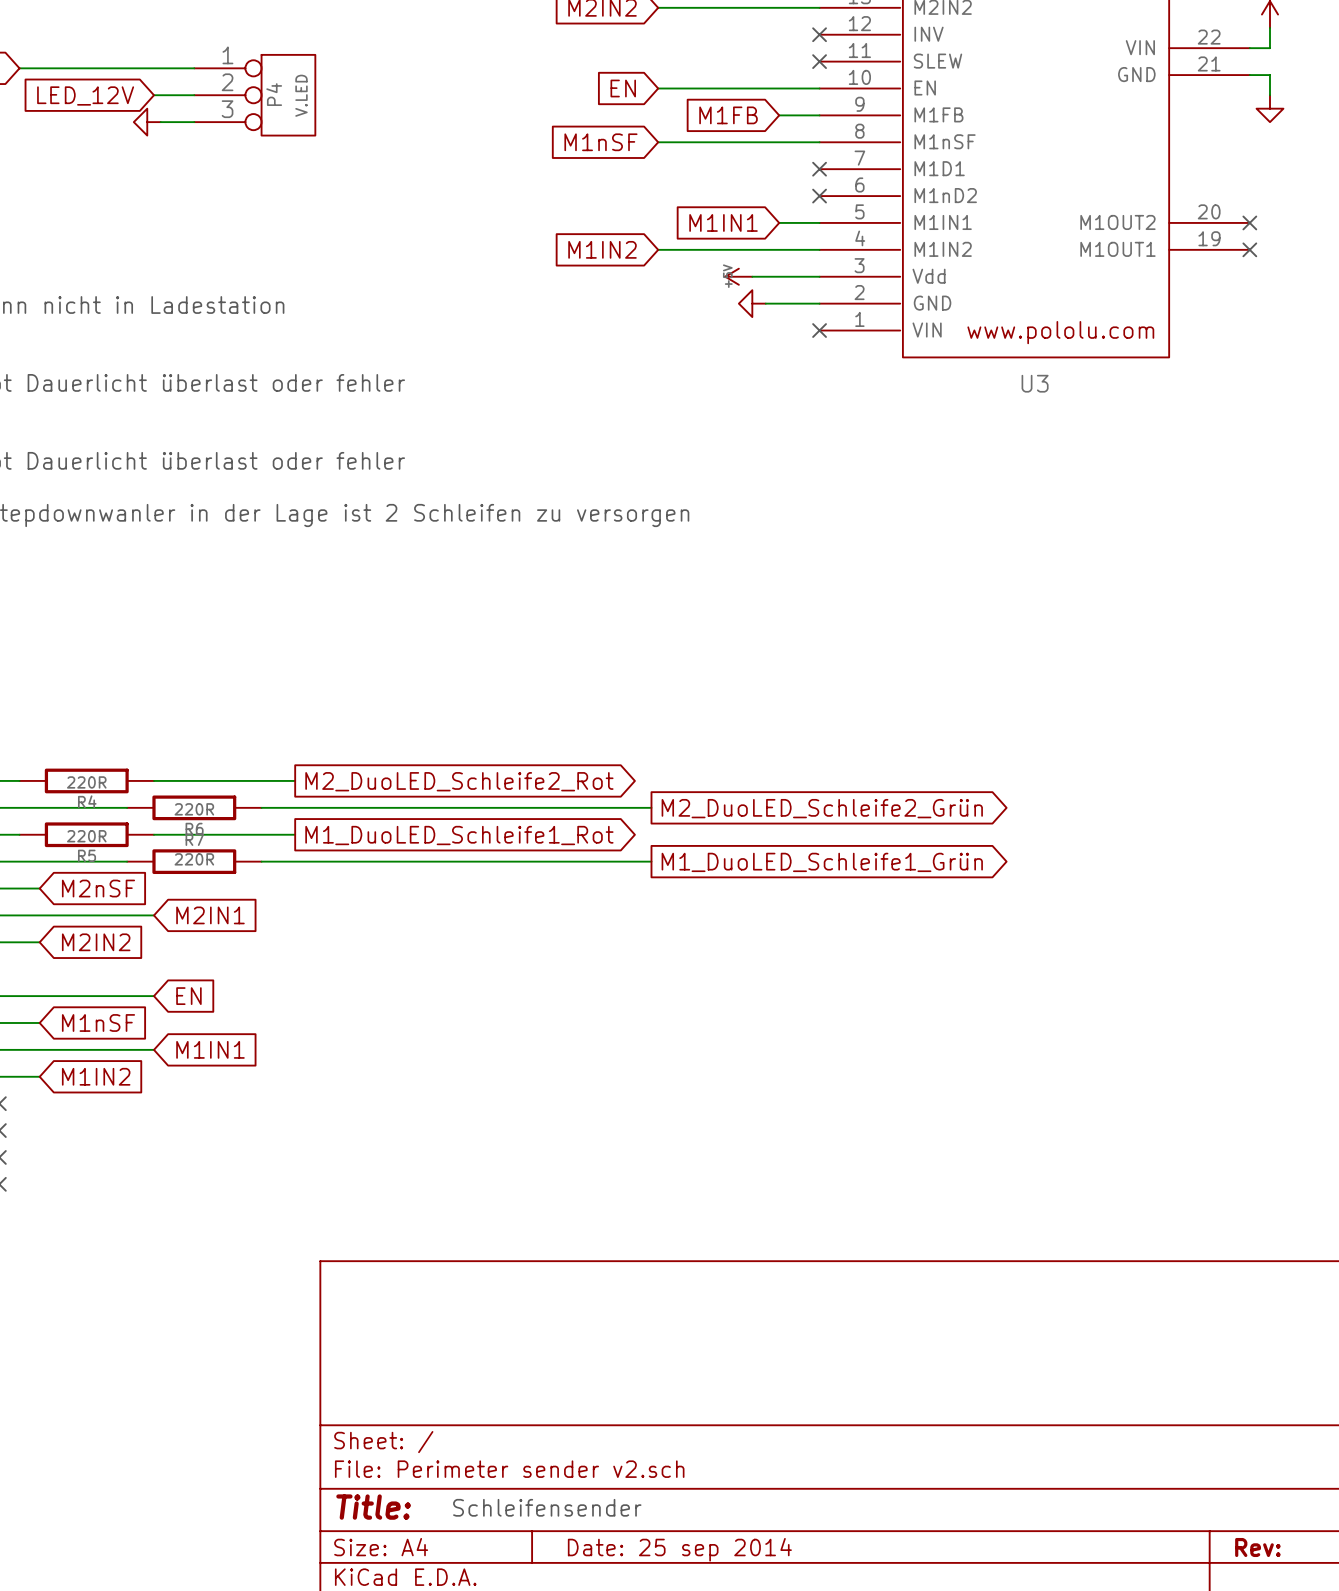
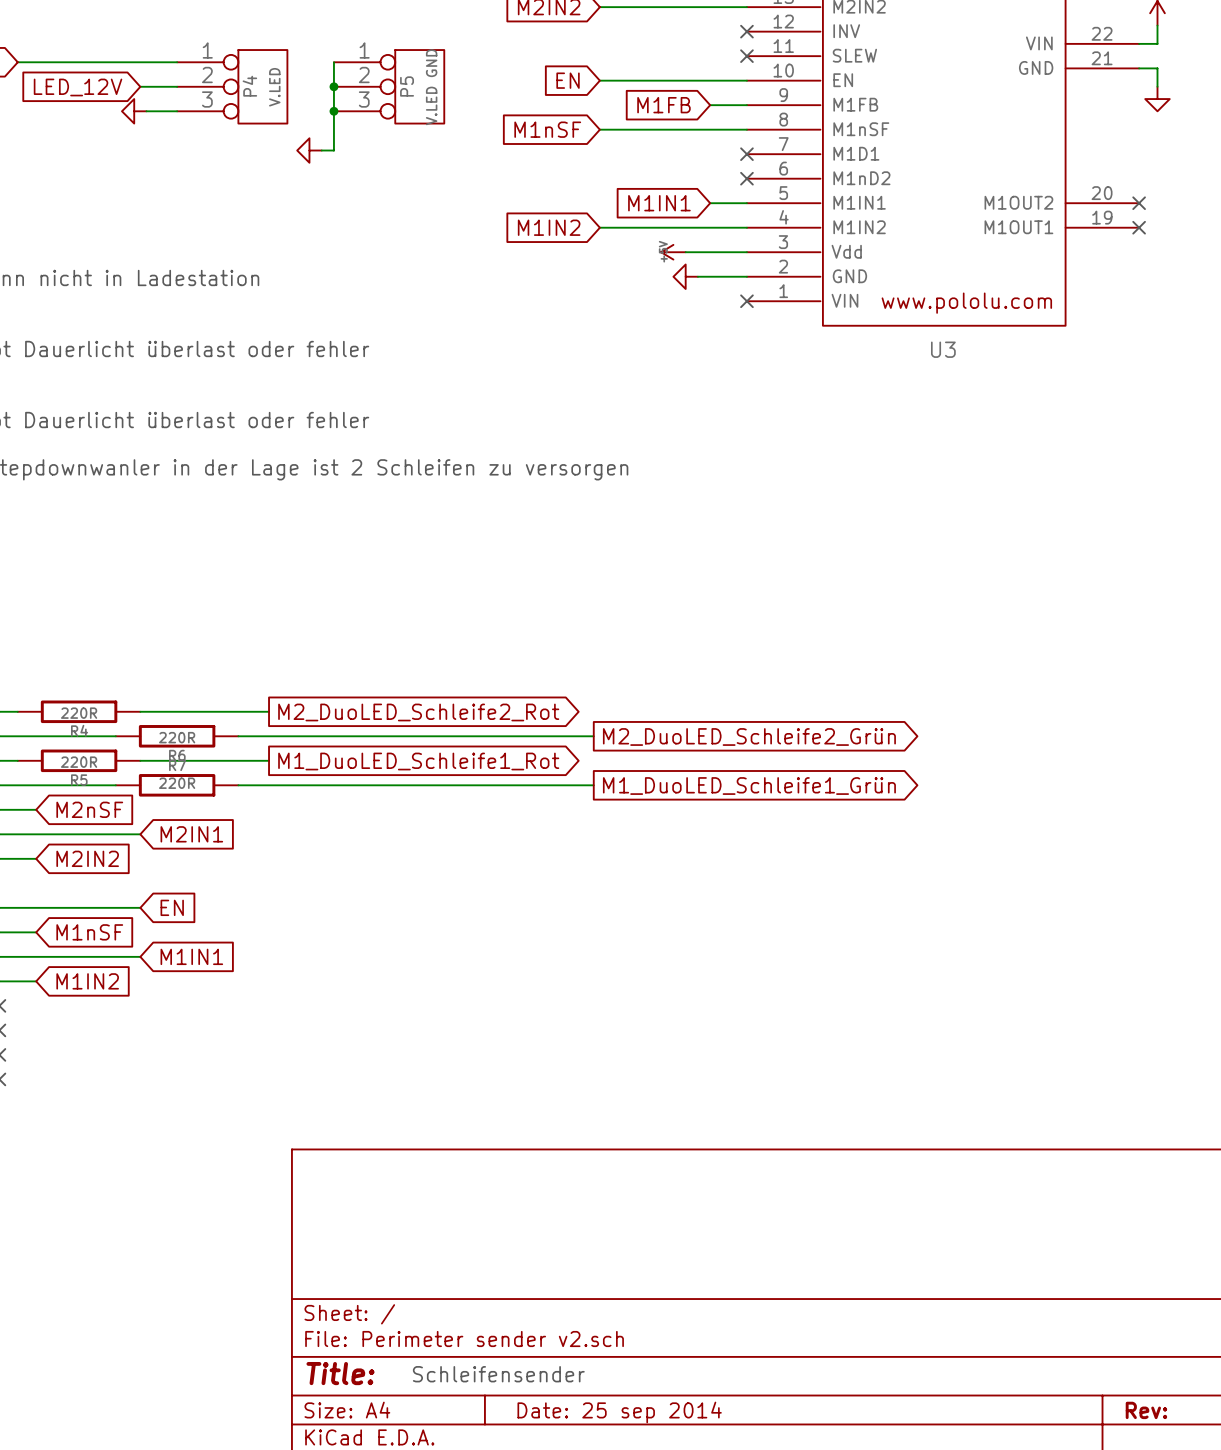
wire: none -> (333, 62) (333, 150) (321, 150)
junction: none -> (333, 86)
P5: none -> V.LED GND (389, 86)
junction: none -> (333, 111)
power symbol: none -> (309, 150)

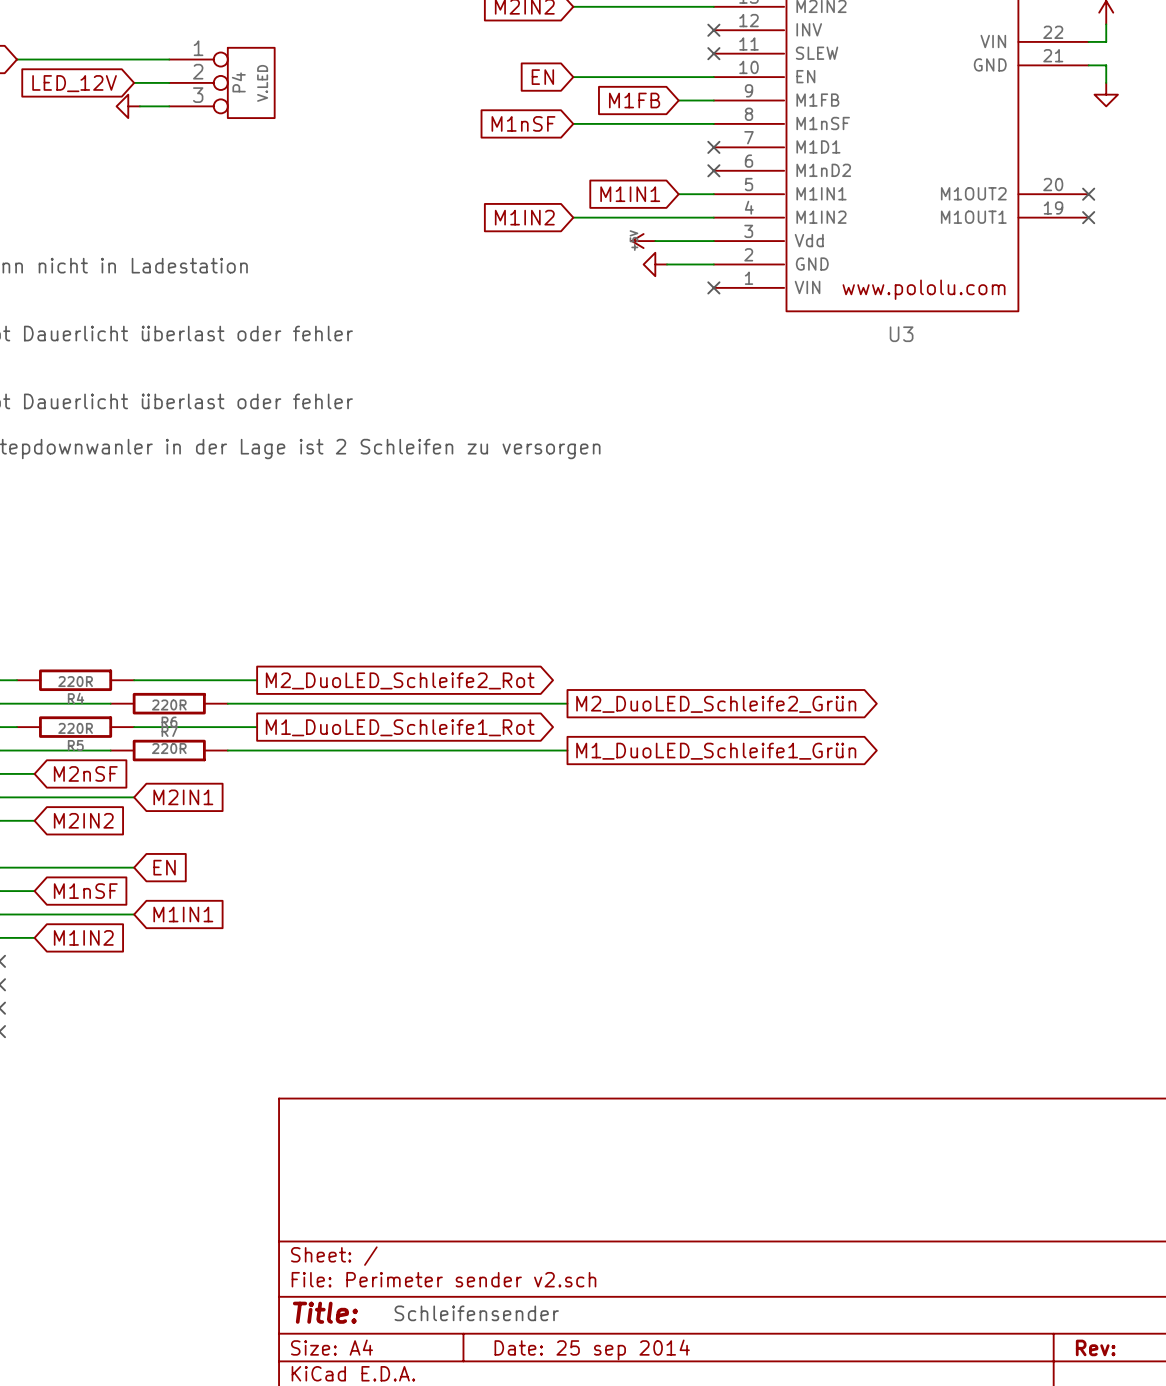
wire: (333, 62) (333, 150) (321, 150) -> none
junction: (333, 86) -> none
P5: V.LED GND (389, 86) -> none
junction: (333, 111) -> none
power symbol: (309, 150) -> none

